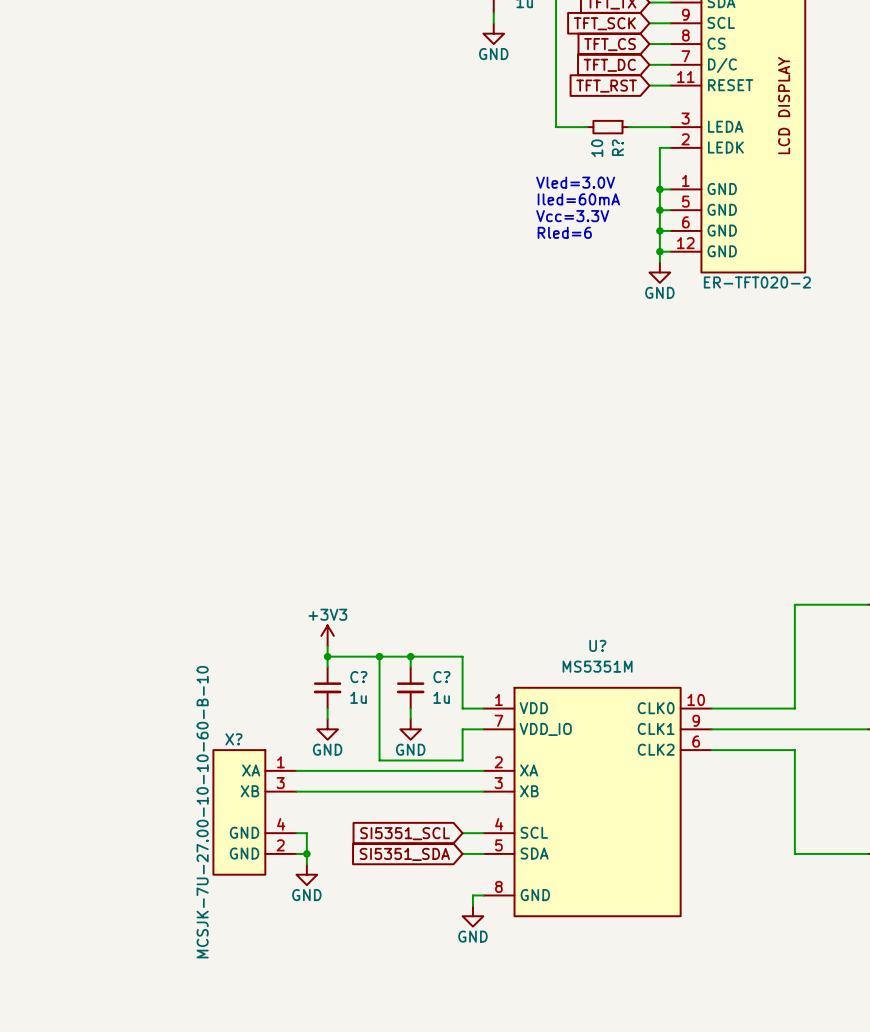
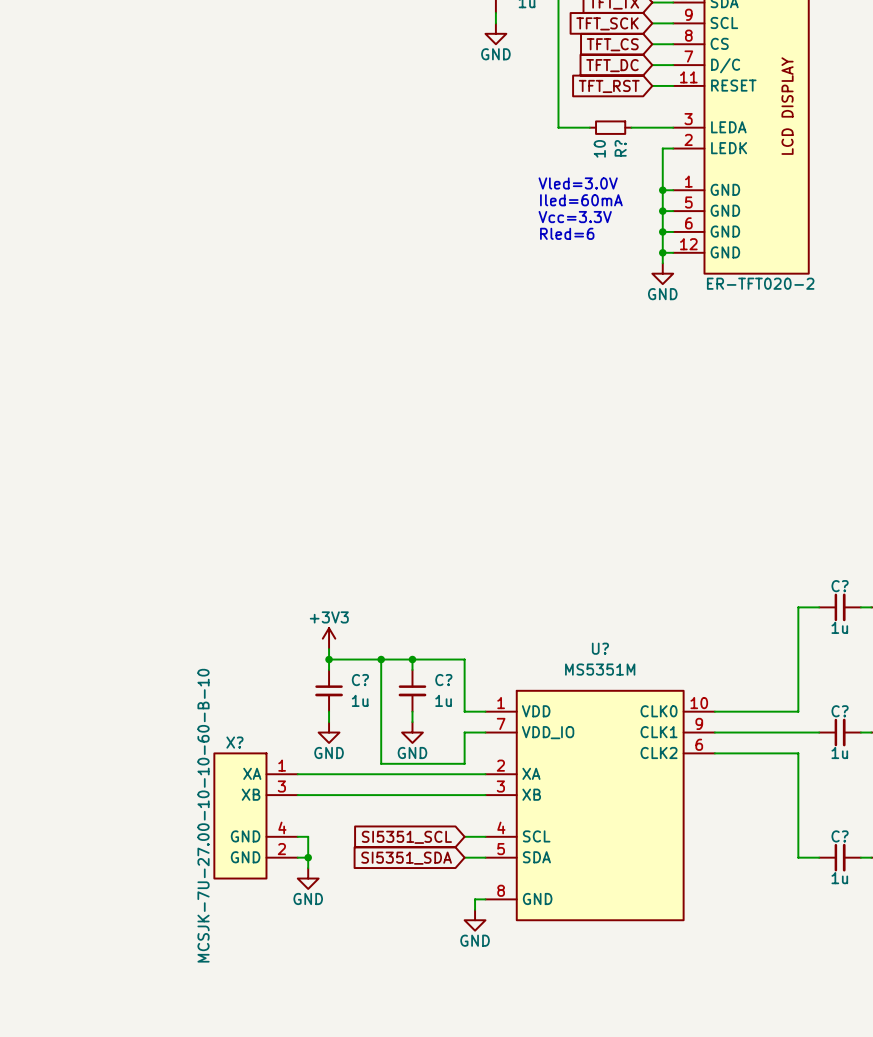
C?: none -> 1u (840, 607)
C?: none -> 1u (840, 732)
C?: none -> 1u (840, 857)

